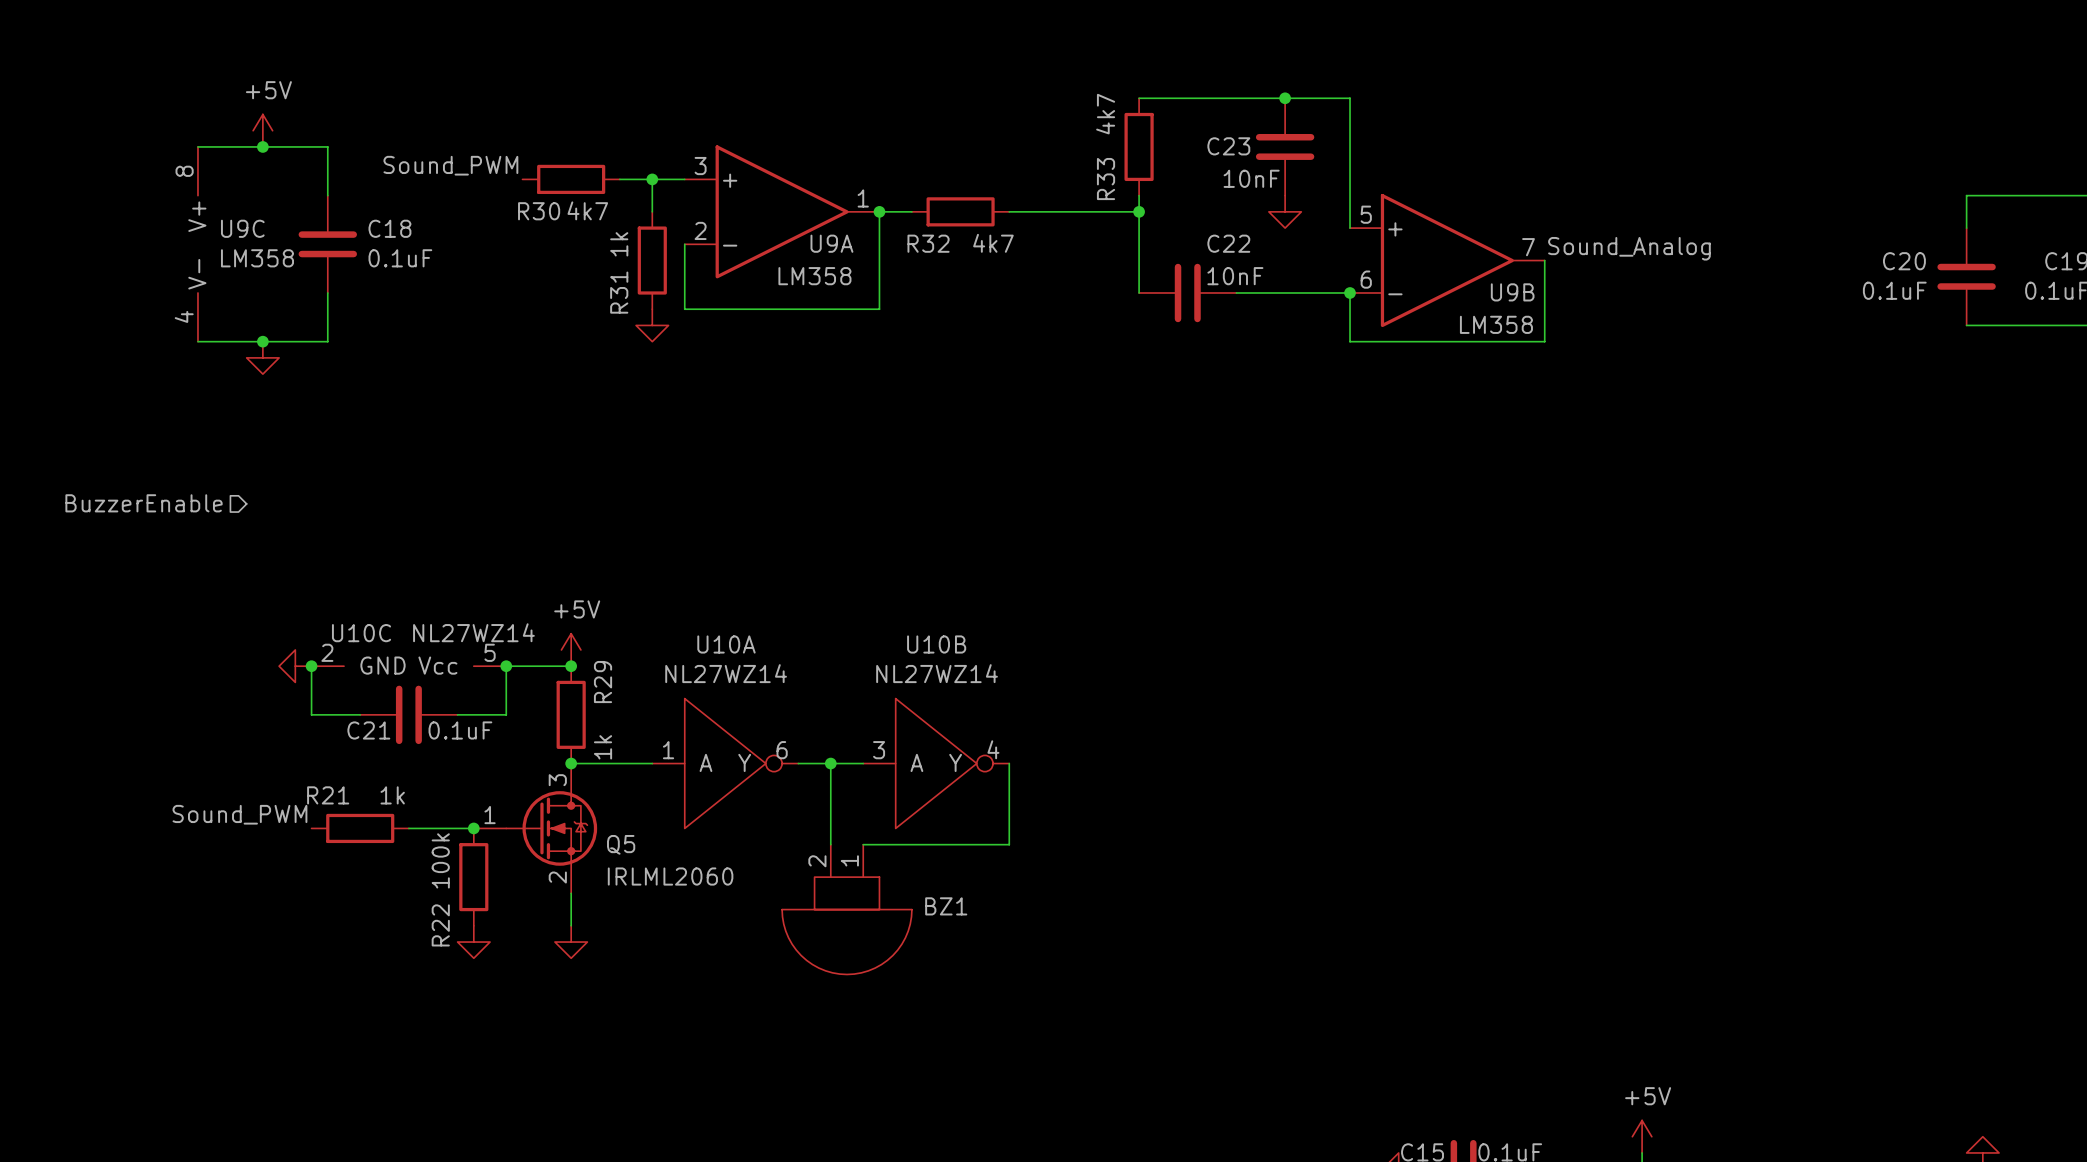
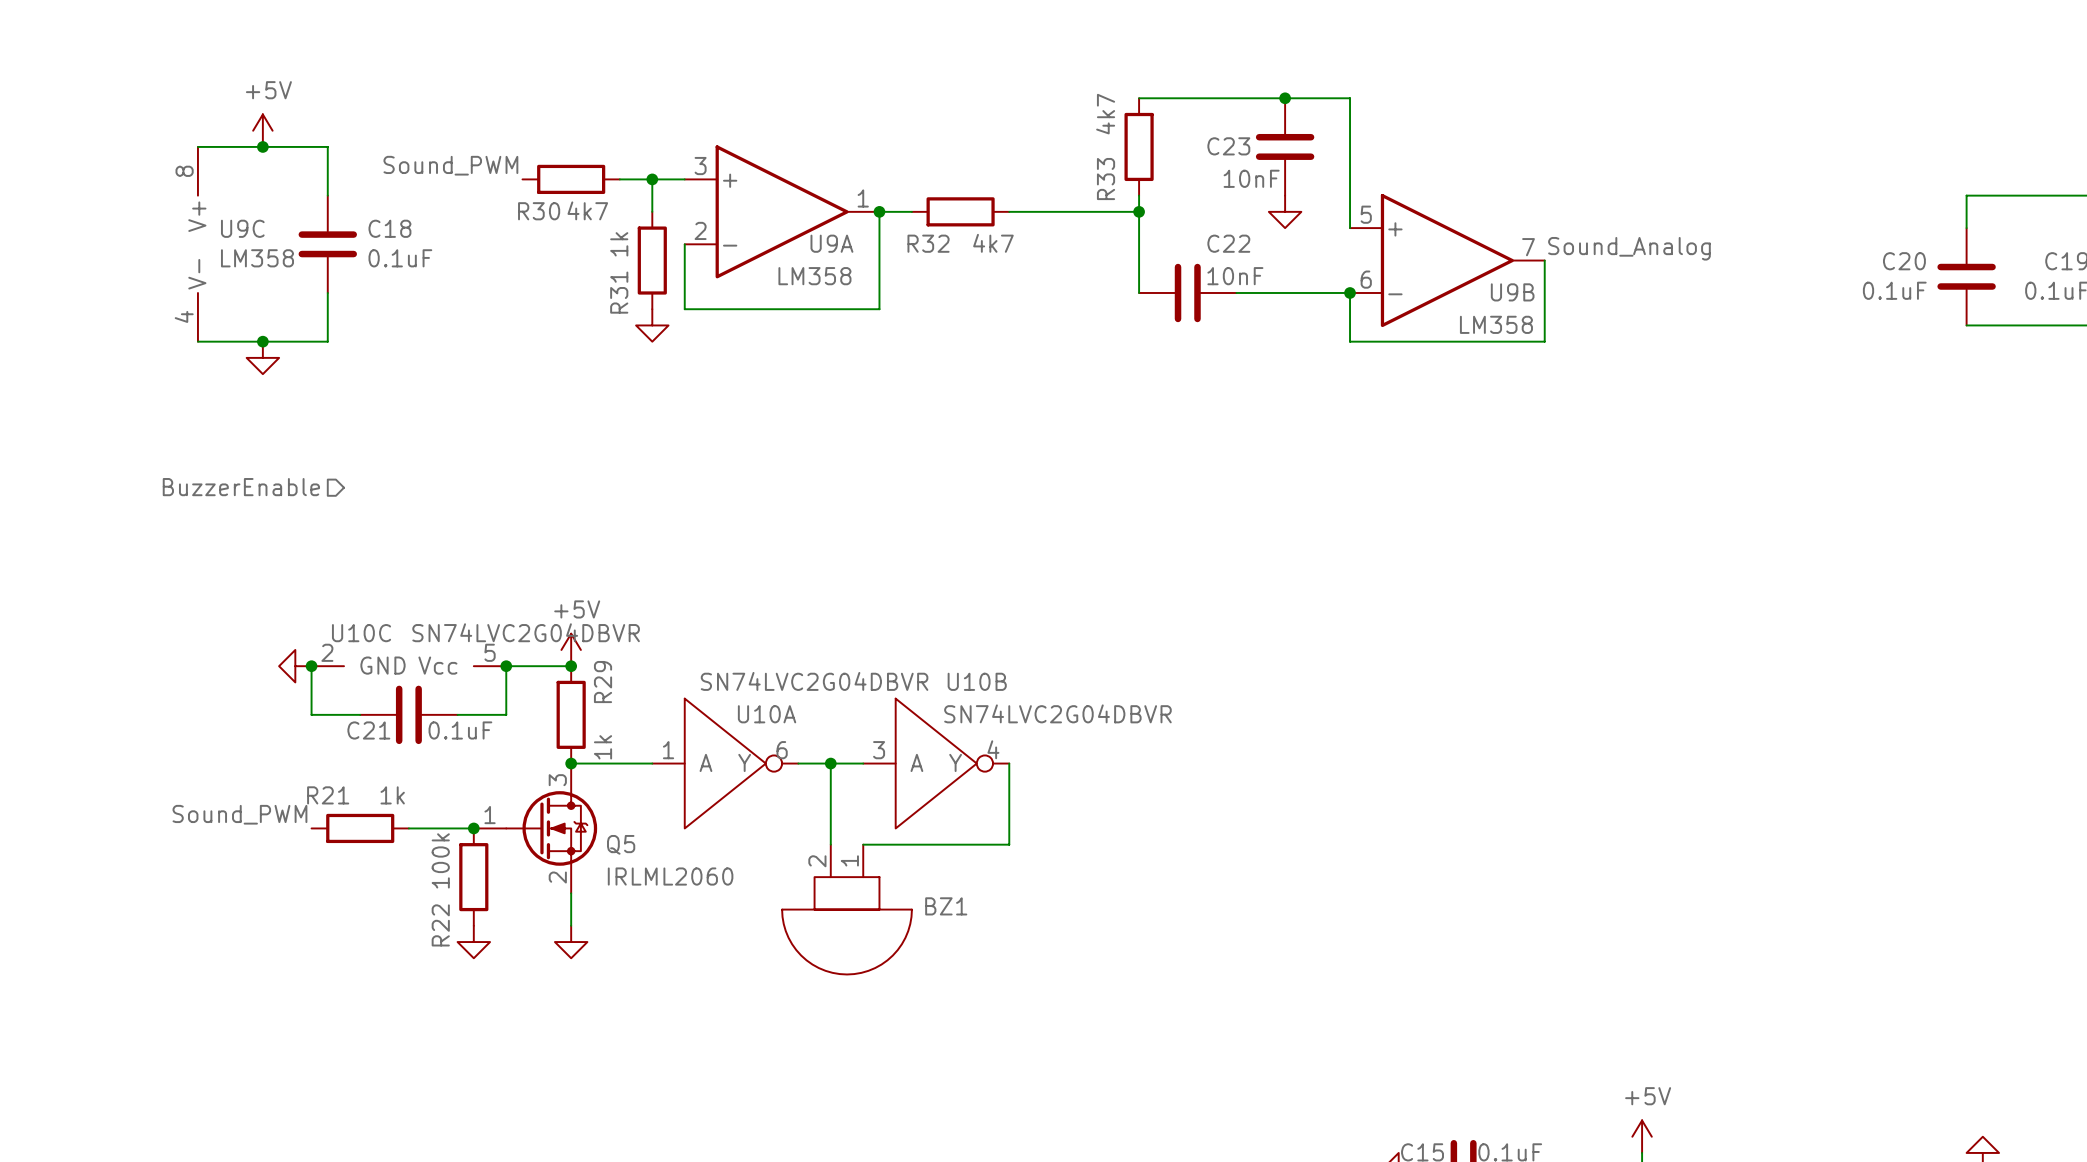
hierarchical label position: BuzzerEnable (144, 503) -> BuzzerEnable (241, 487)
U10C value: NL27WZ14 (473, 632) -> SN74LVC2G04DBVR (526, 632)
U10A name position: U10A (726, 644) -> U10A (767, 714)
U10B name position: U10B (936, 644) -> U10B (977, 681)
U10A value: NL27WZ14 (726, 673) -> SN74LVC2G04DBVR (814, 681)
U10B value: NL27WZ14 (937, 673) -> SN74LVC2G04DBVR (1057, 713)

